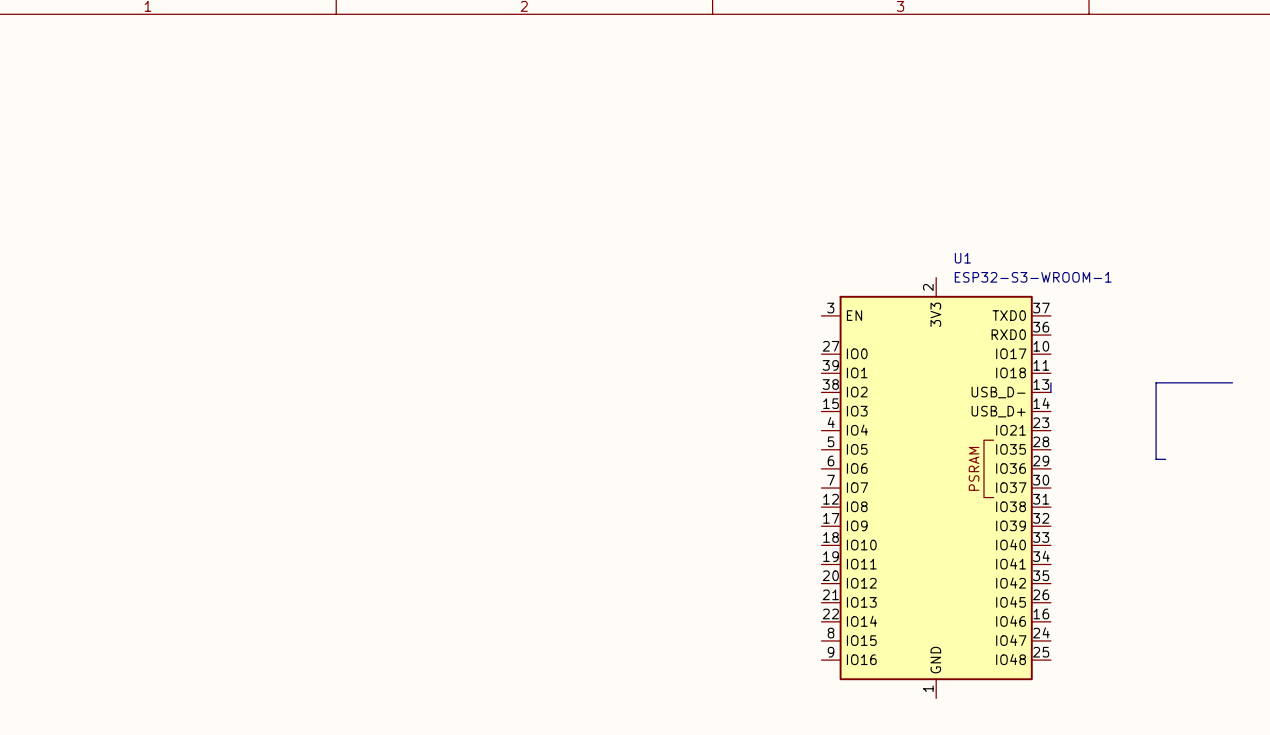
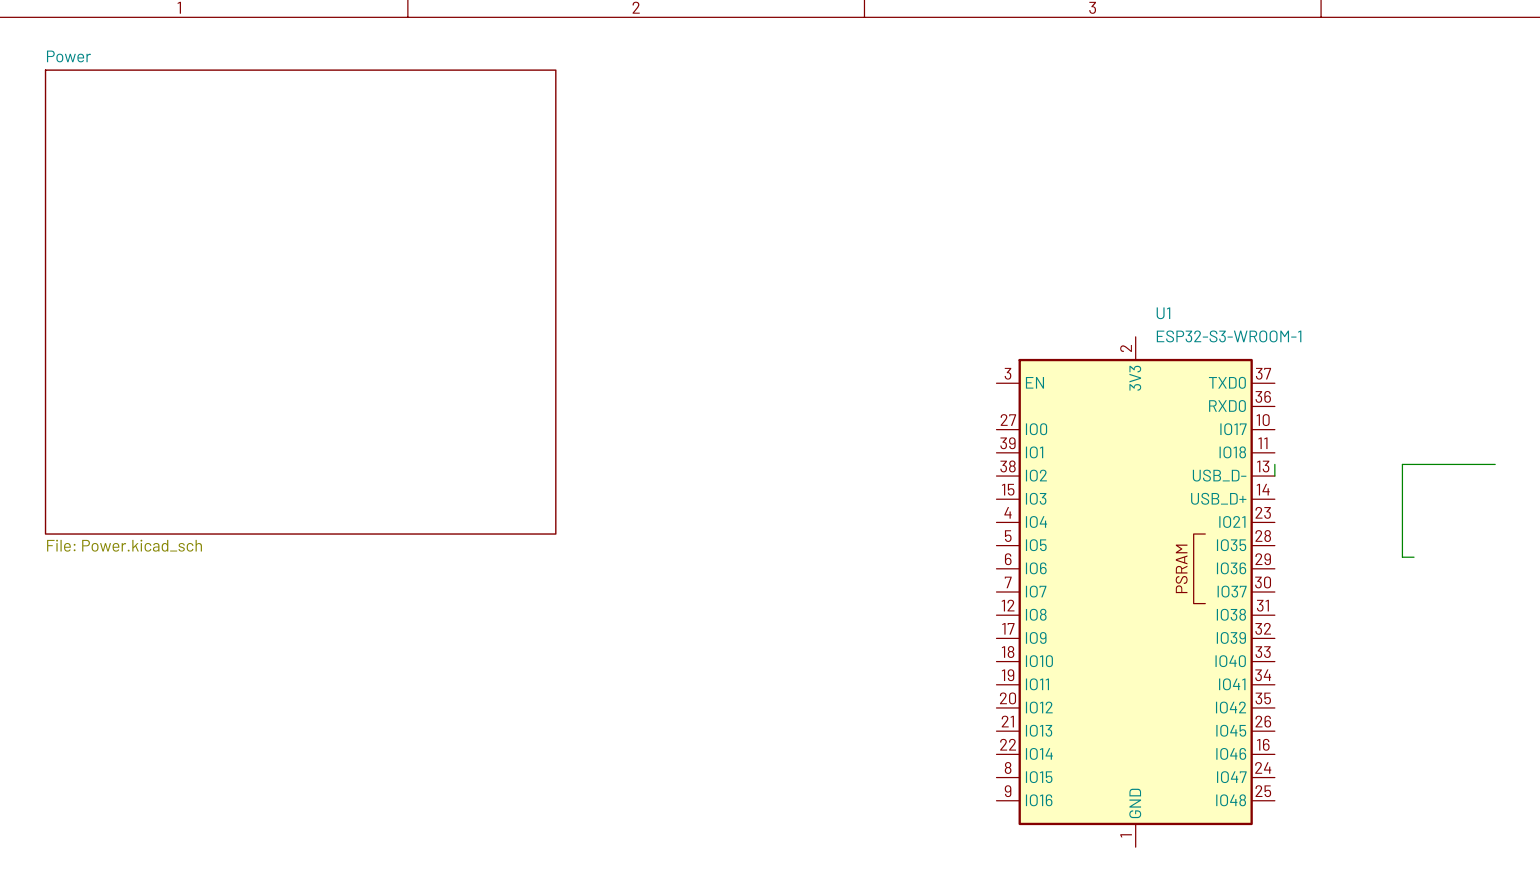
sheet Power: none -> File: Power.kicad_sch (300, 302)

